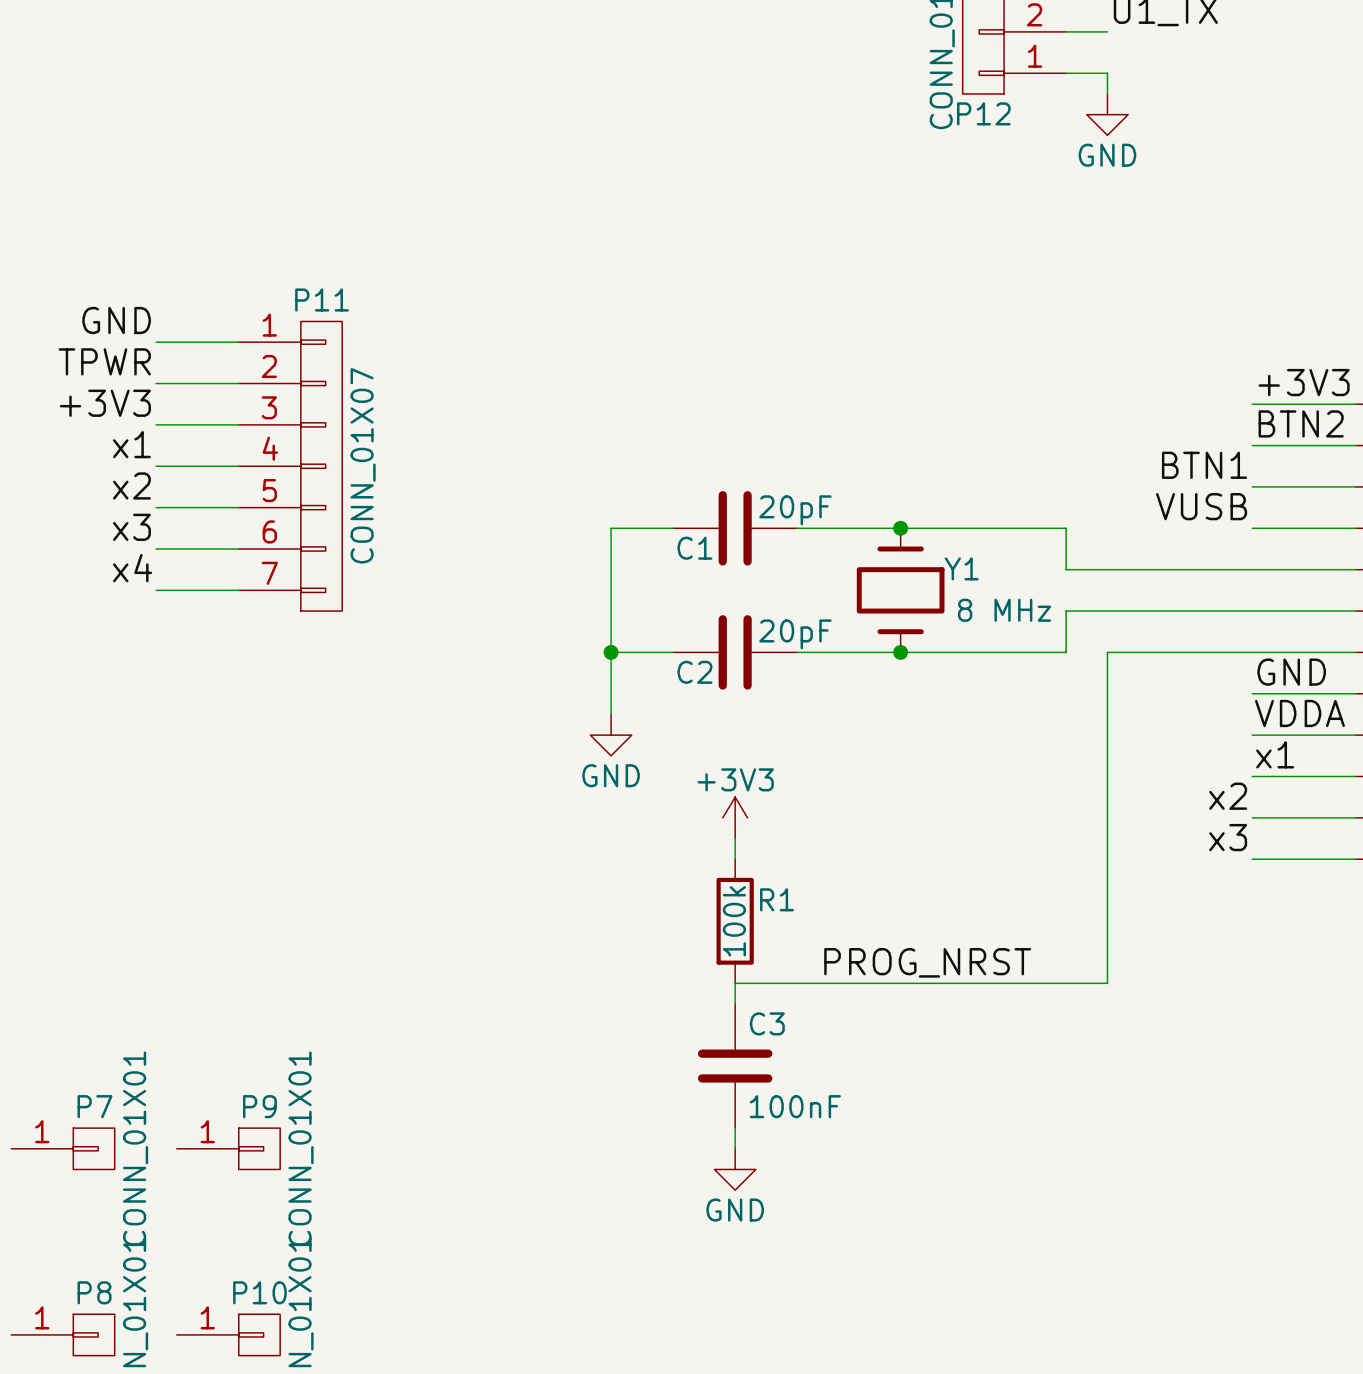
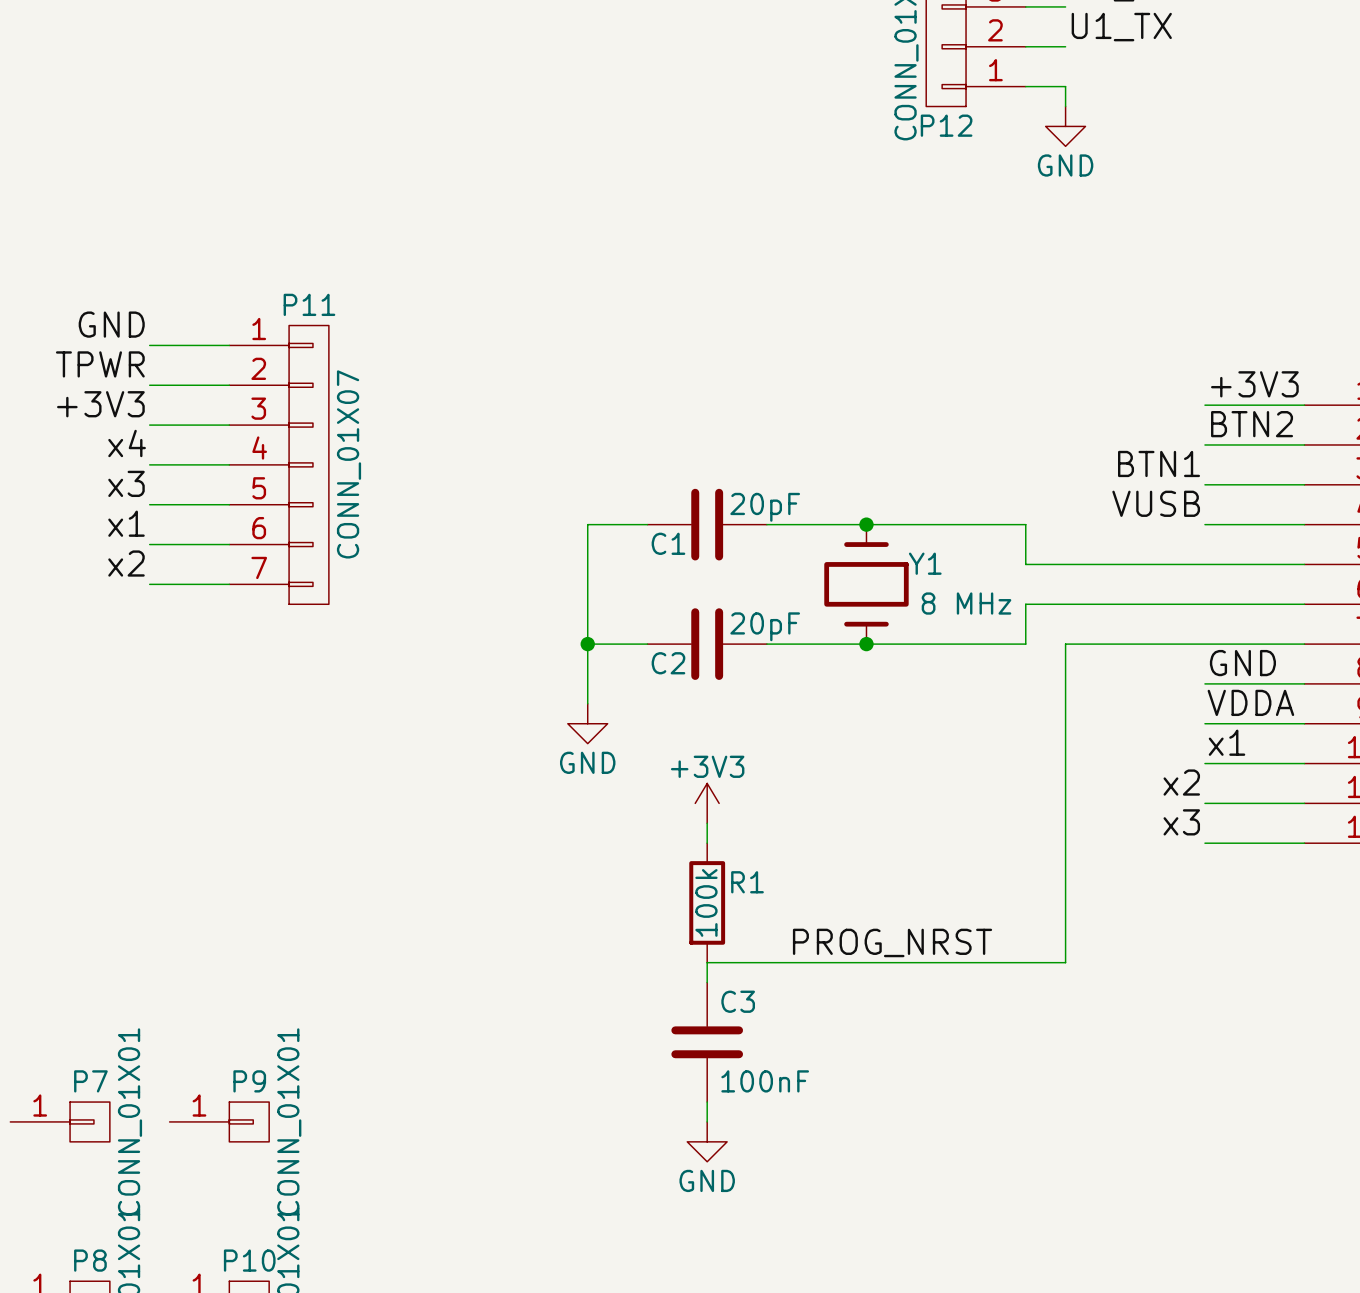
label: x1 (131, 444) -> x4 (127, 443)
label: x2 (131, 485) -> x3 (126, 483)
label: x3 (131, 527) -> x1 (126, 523)
label: x4 (132, 568) -> x2 (126, 563)

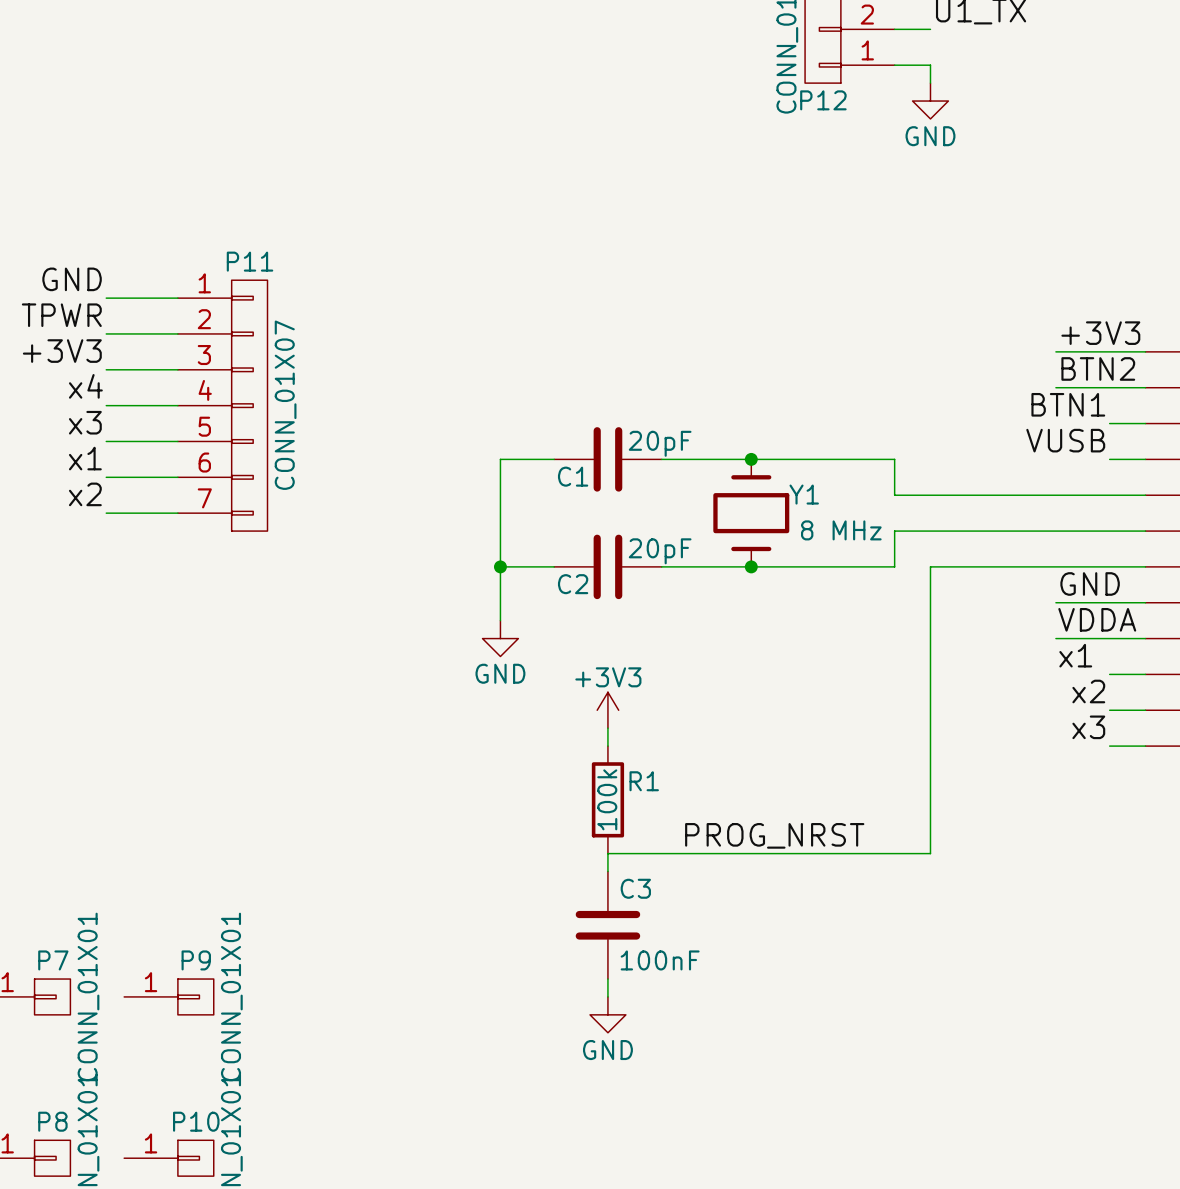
label position: BTN1 (1159, 463) -> BTN1 (1068, 404)
wire: (1204, 484) (1264, 484) -> none
label position: VUSB (1156, 503) -> VUSB (1065, 440)
wire: (1204, 524) (1264, 524) -> none
wire: (1204, 763) (1264, 763) -> none
label position: x2 (1181, 782) -> x2 (1088, 691)
wire: (1204, 803) (1264, 803) -> none
label position: x3 (1181, 822) -> x3 (1088, 727)
wire: (1204, 843) (1264, 843) -> none

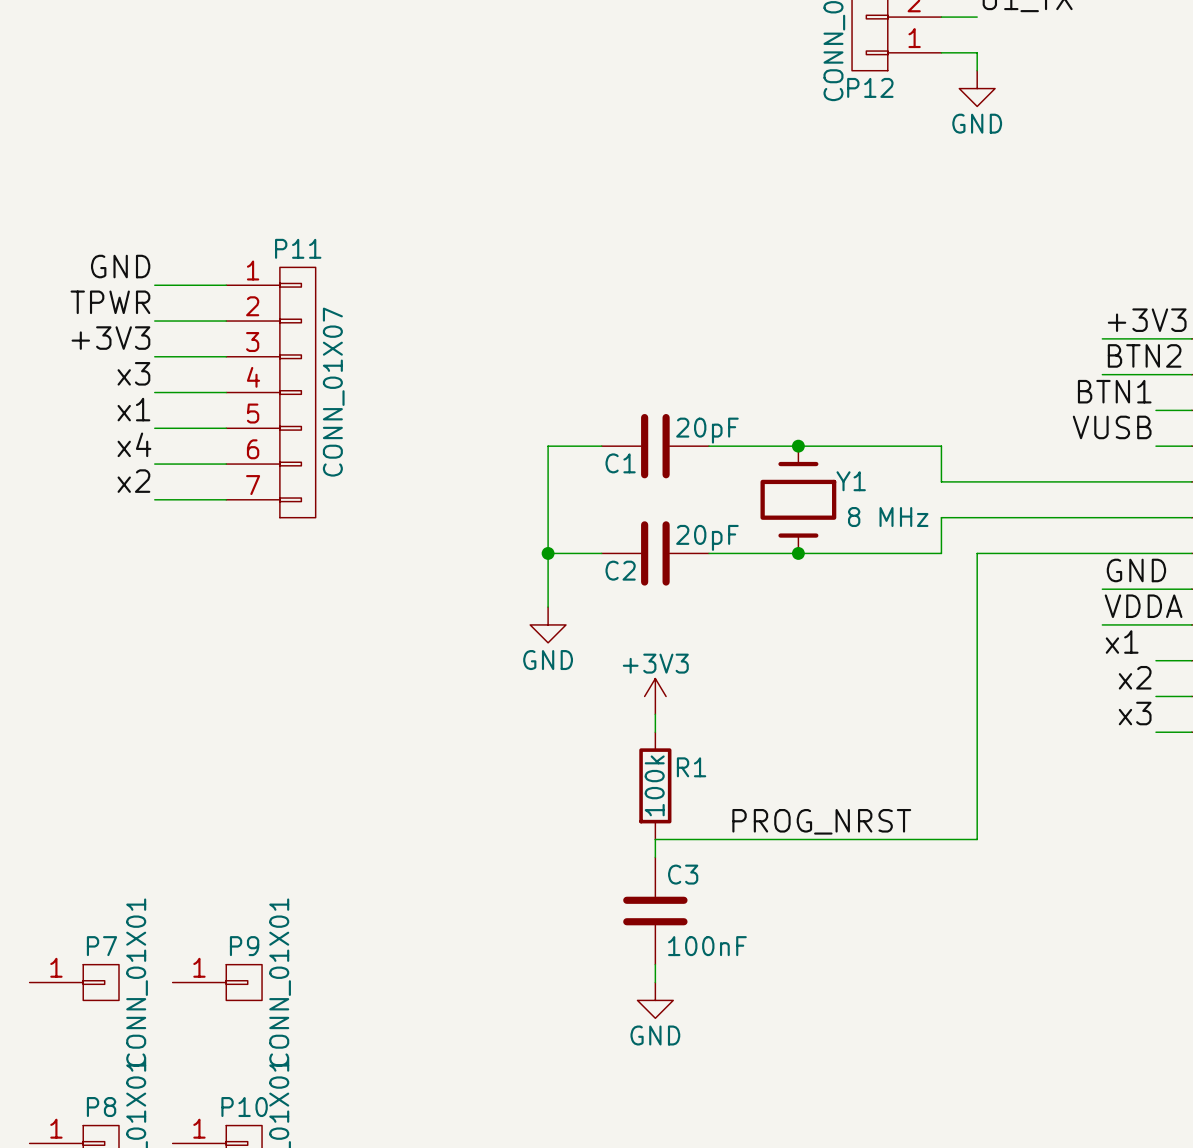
label: x4 (85, 386) -> x3 (133, 373)
label: x3 (85, 422) -> x1 (133, 409)
label: x1 (85, 458) -> x4 (134, 444)

